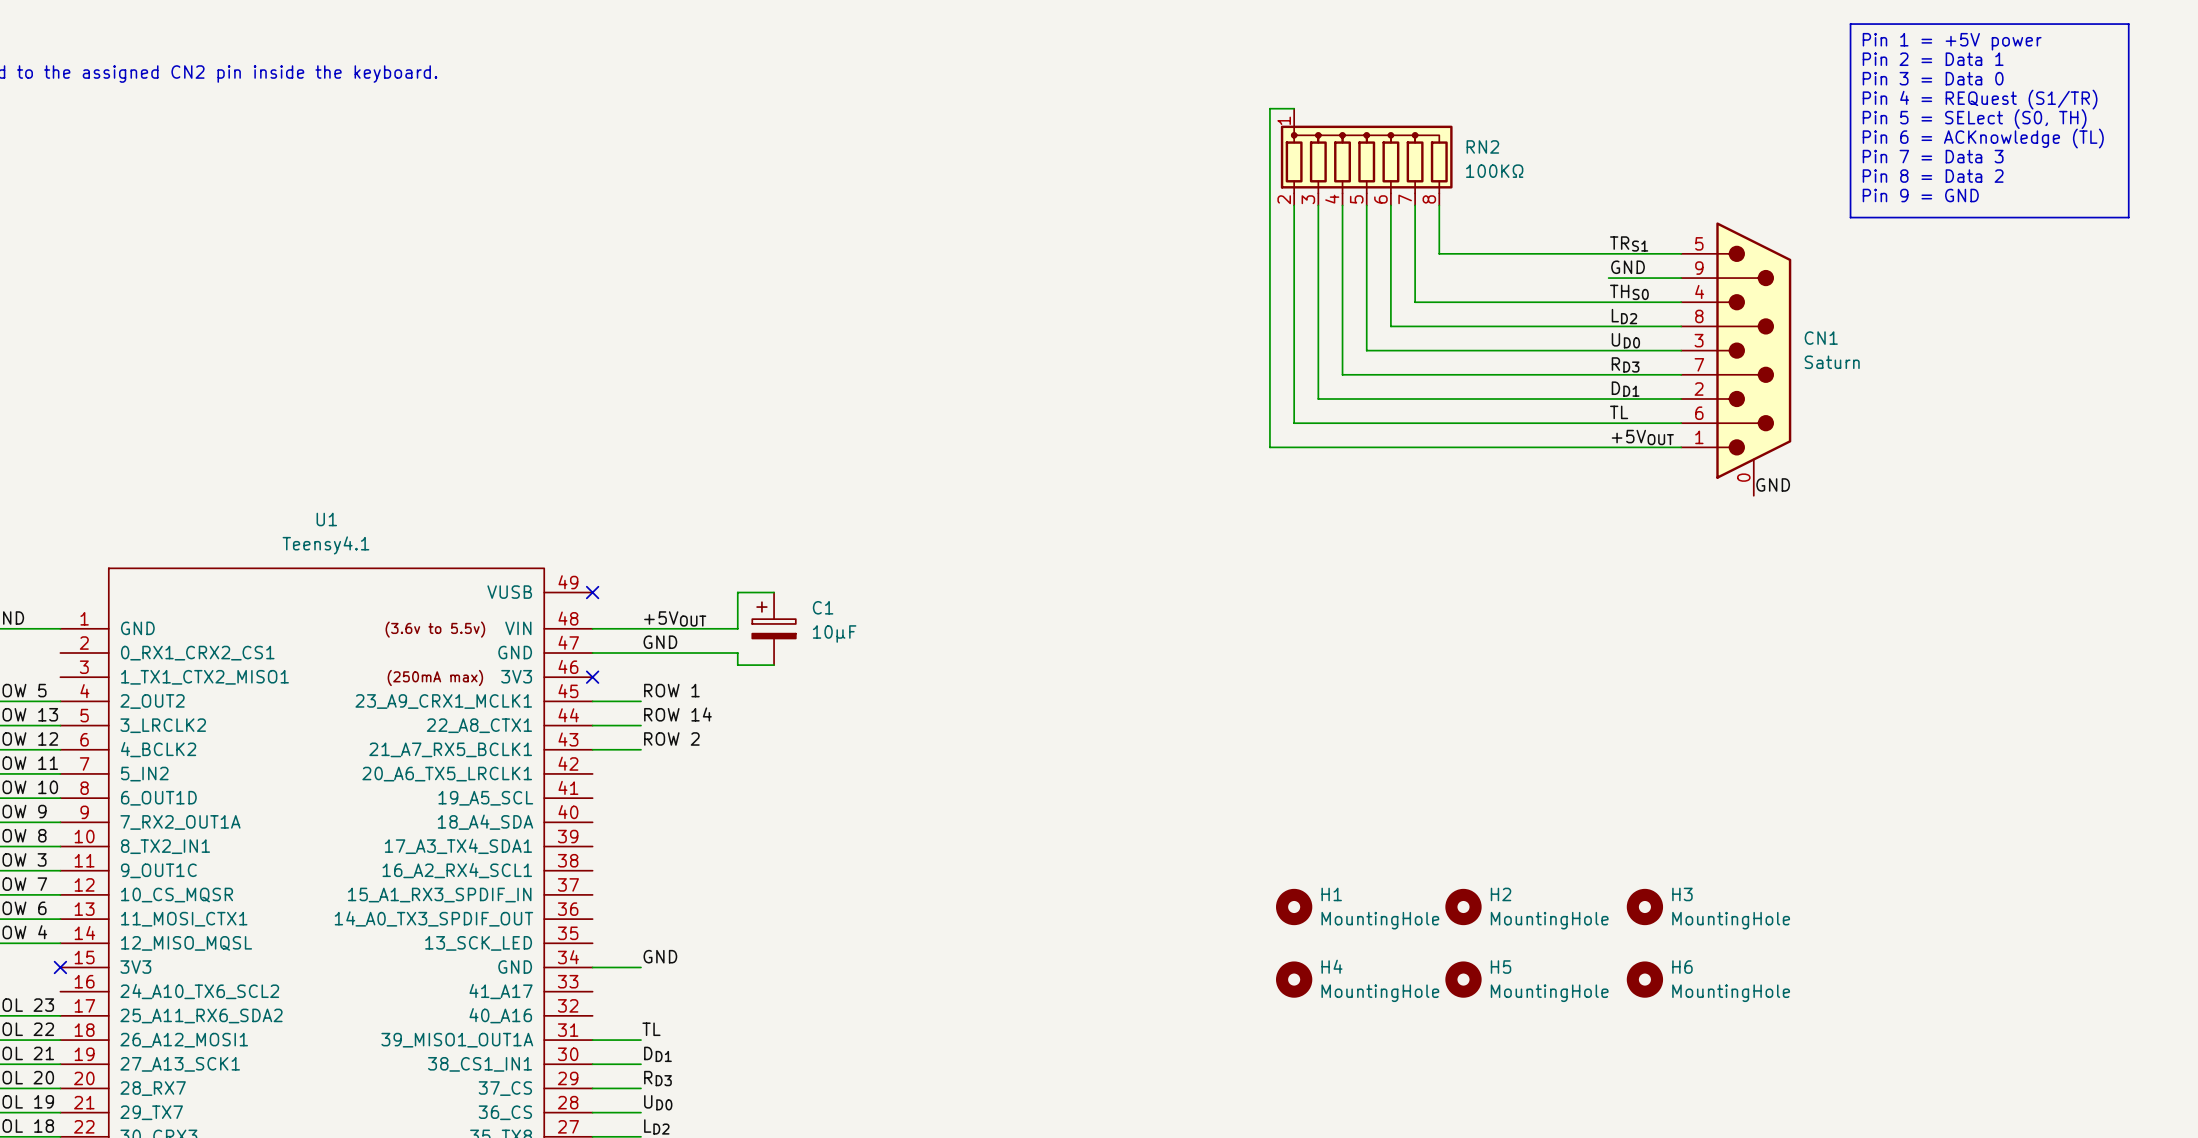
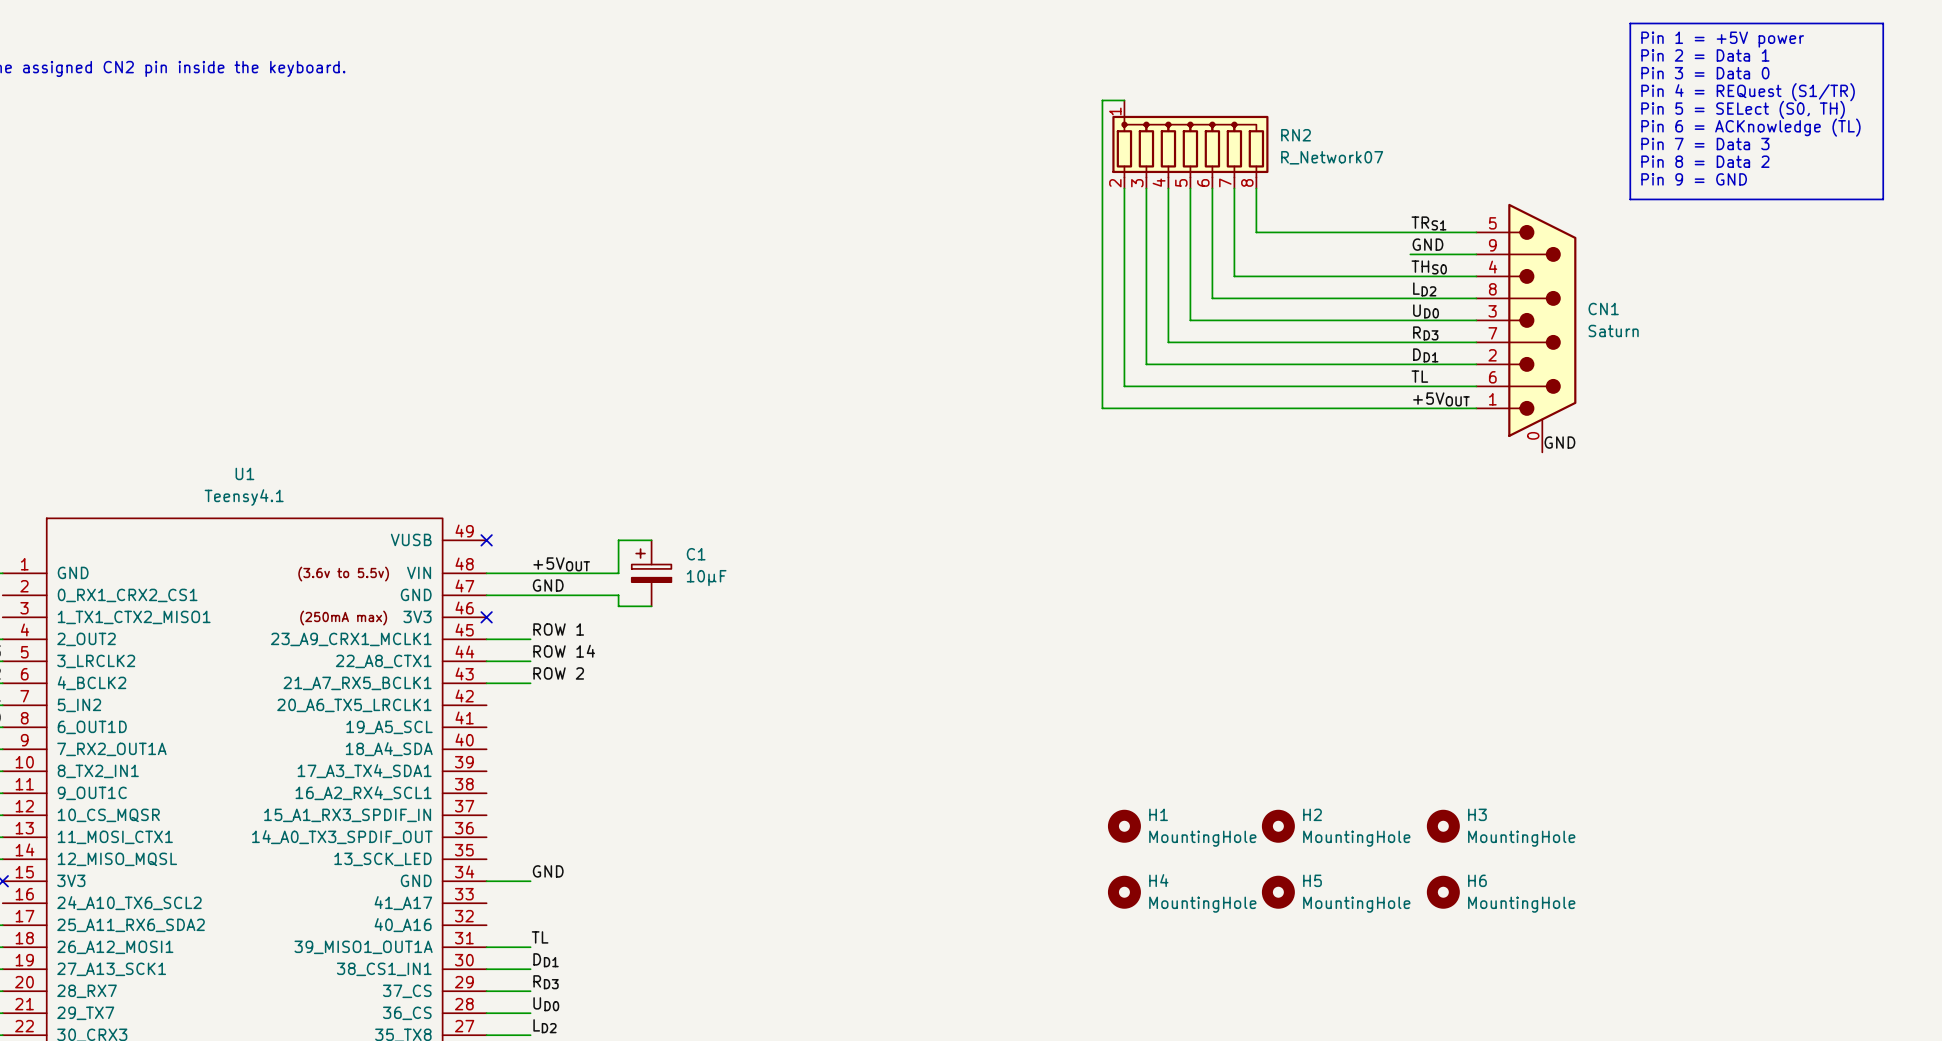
RN2 value: 100KΩ (1494, 171) -> R_Network07 (1332, 157)

